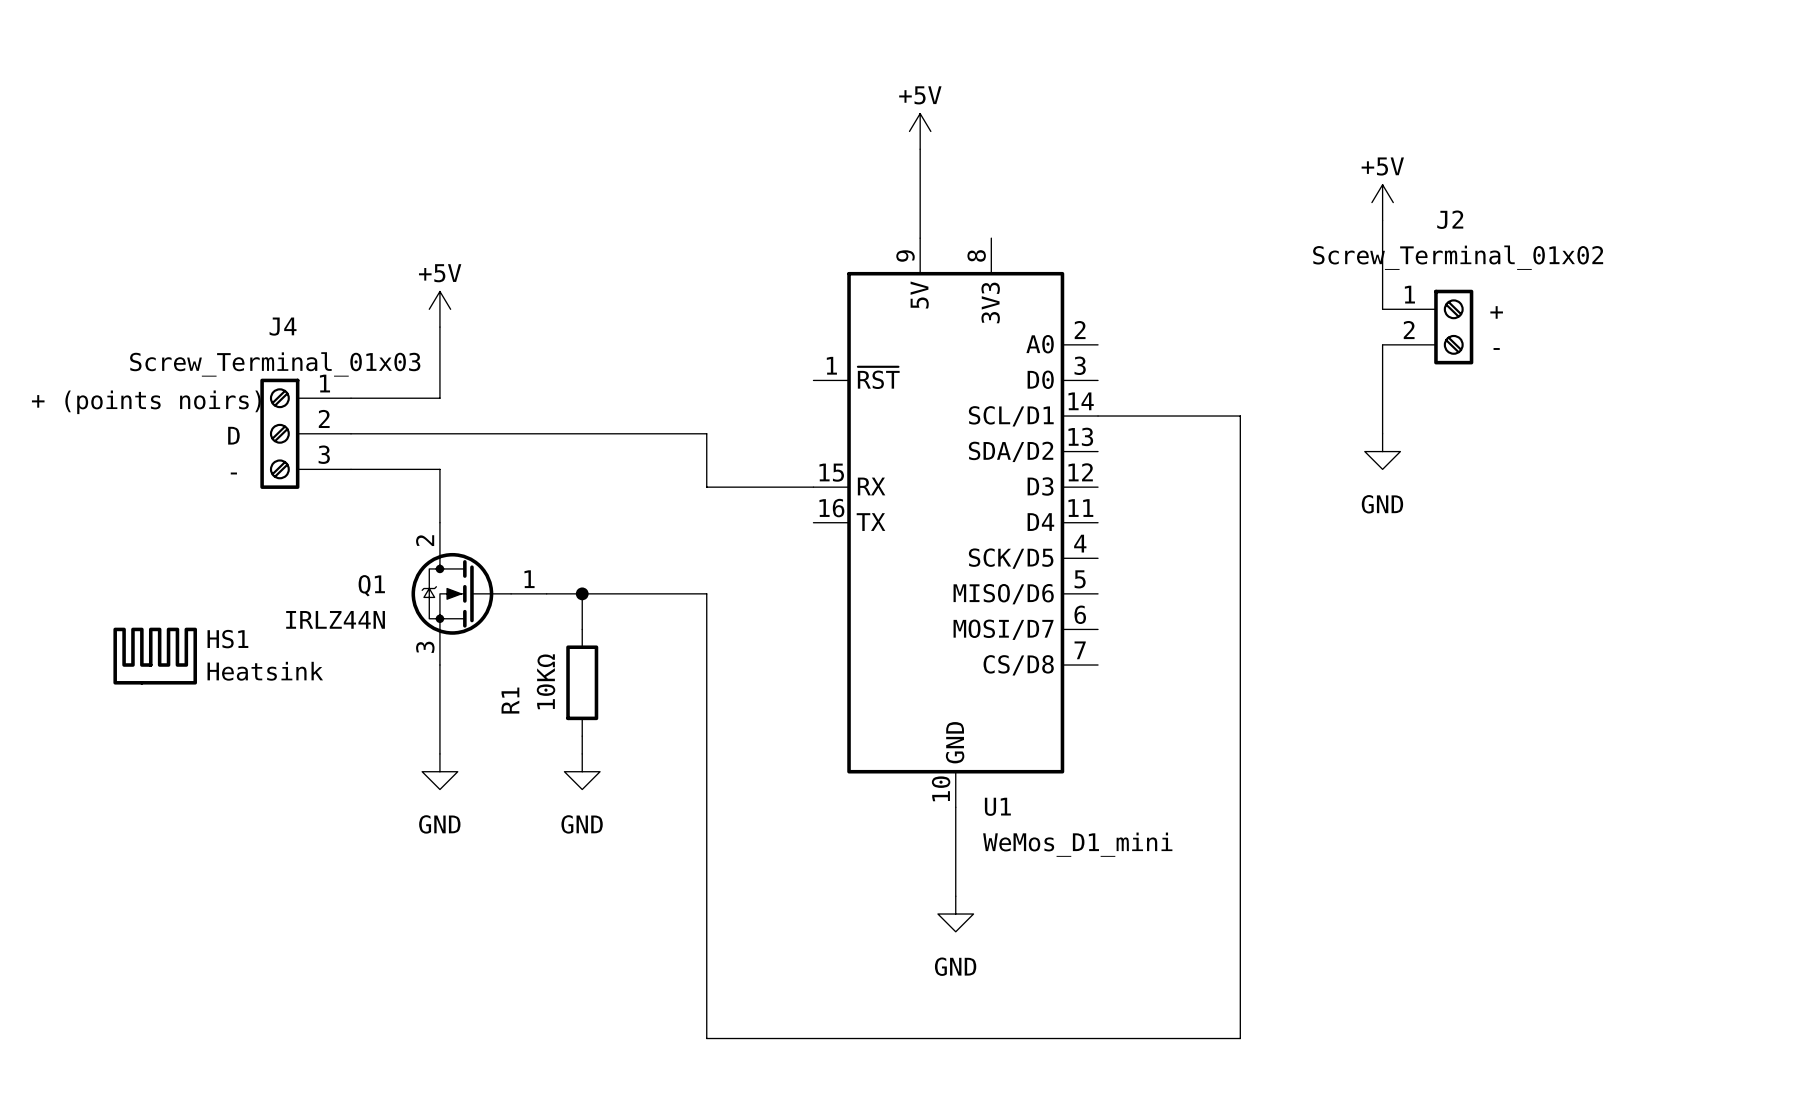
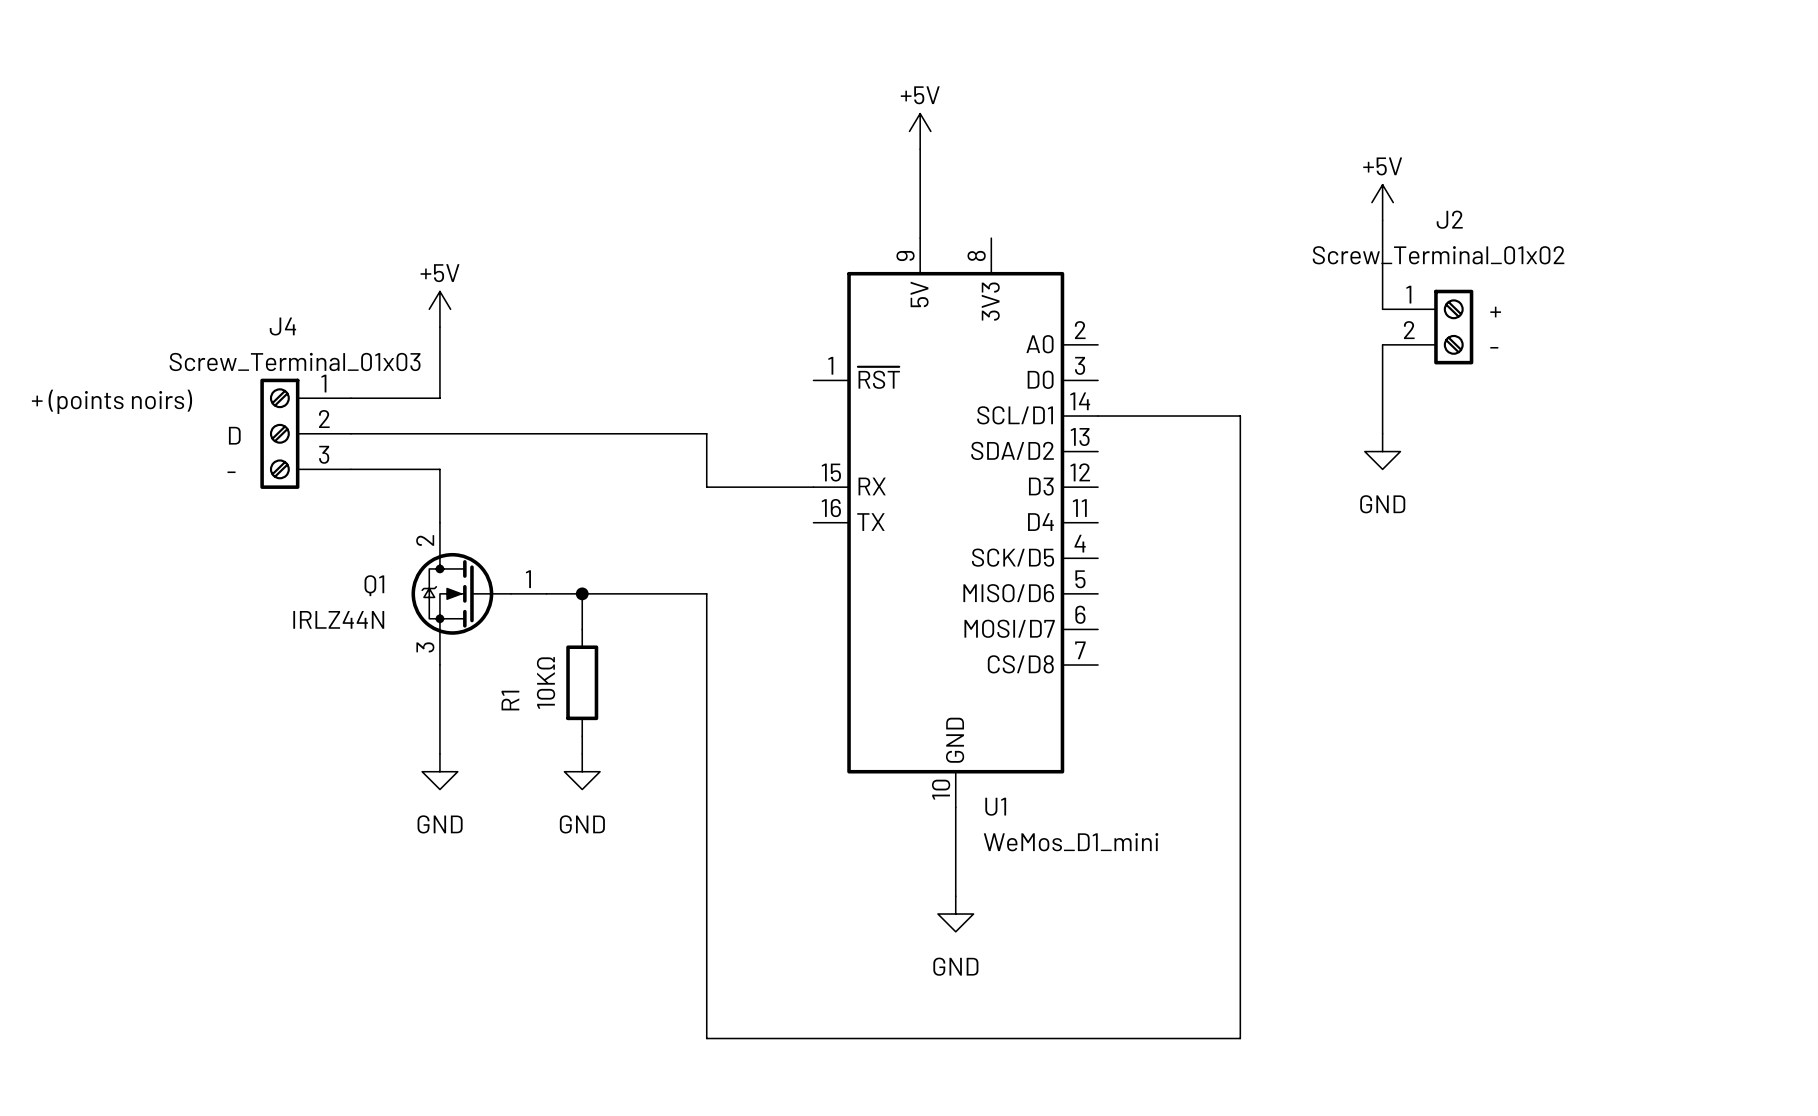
HS1: Heatsink (155, 656) -> none

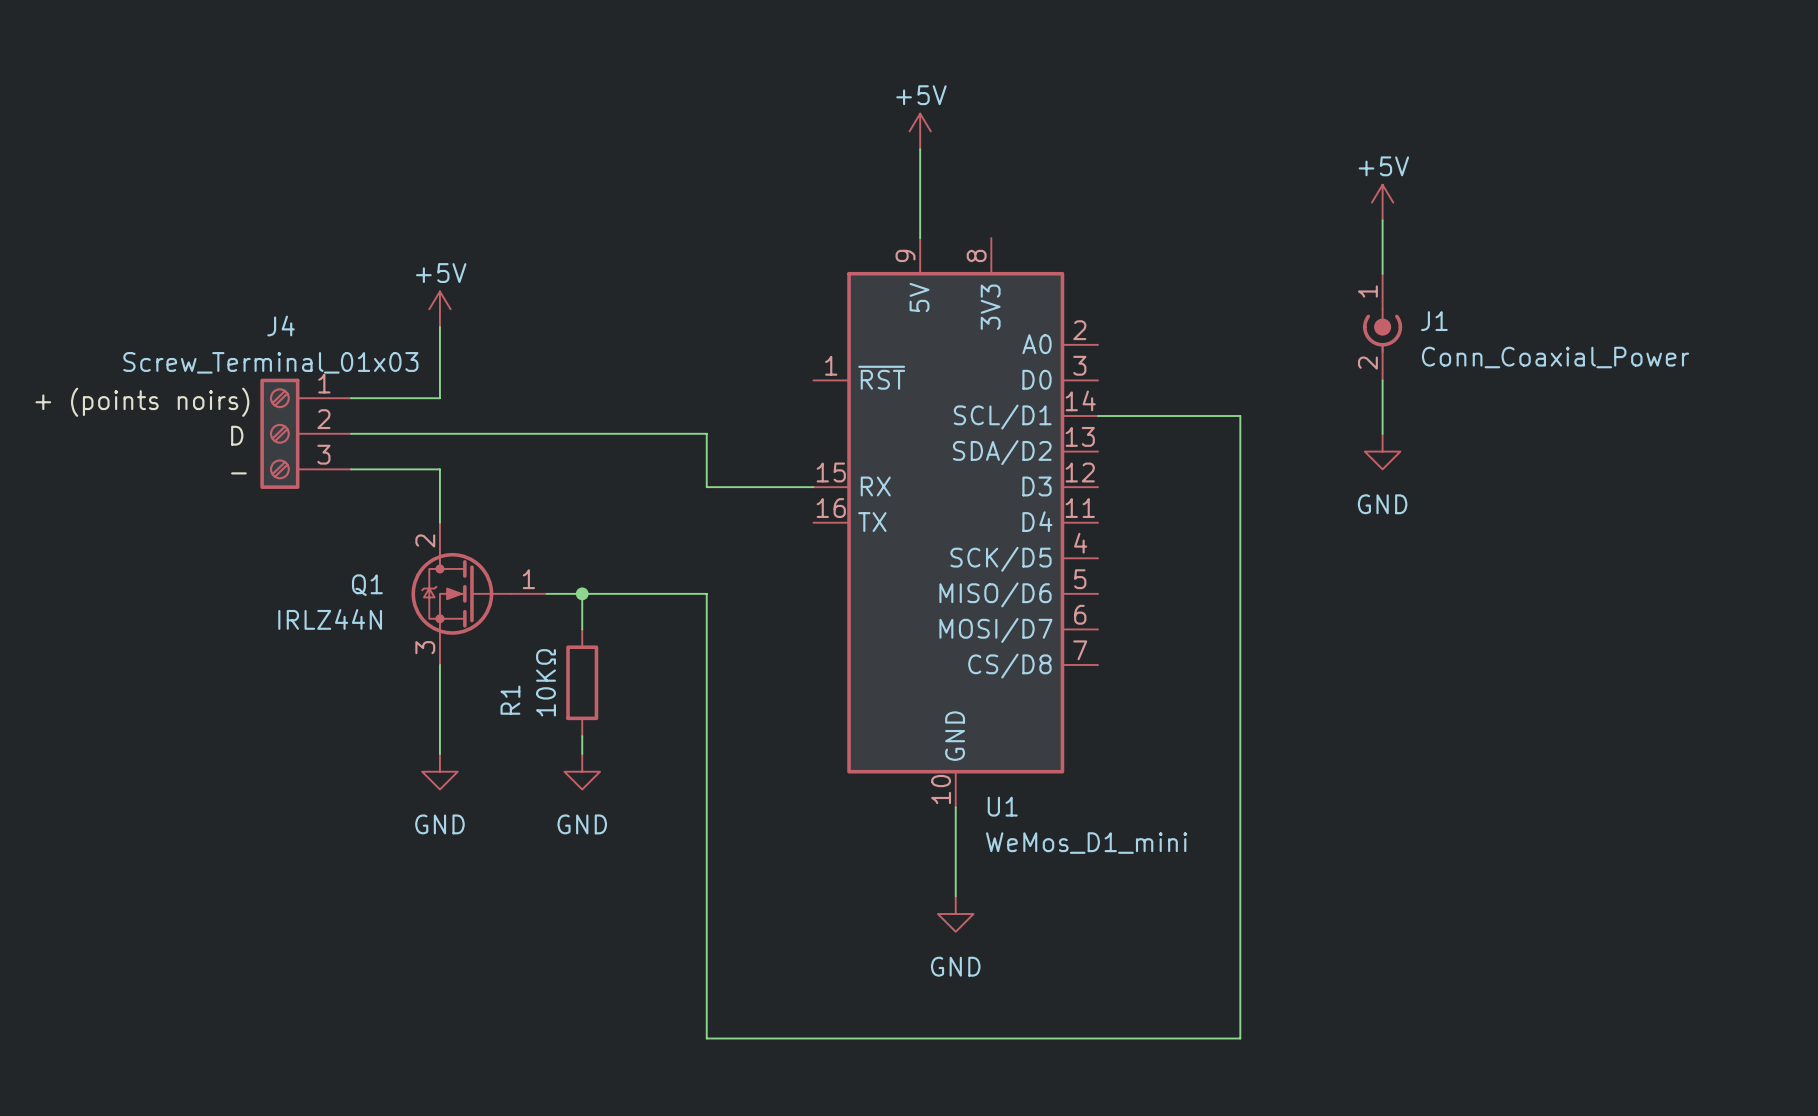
label: + (1495, 312) -> none
J1: none -> Conn_Coaxial_Power (1382, 327)
J2: Screw_Terminal_01x02 (1427, 327) -> none
label: - (1494, 347) -> none

